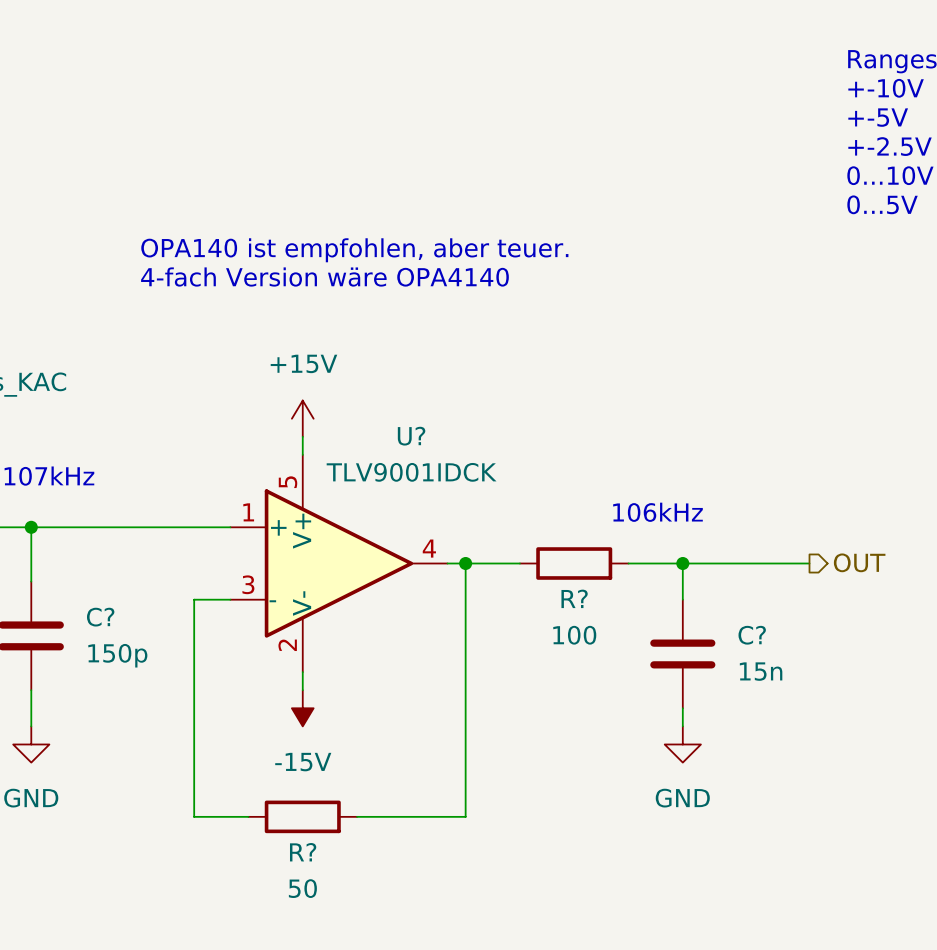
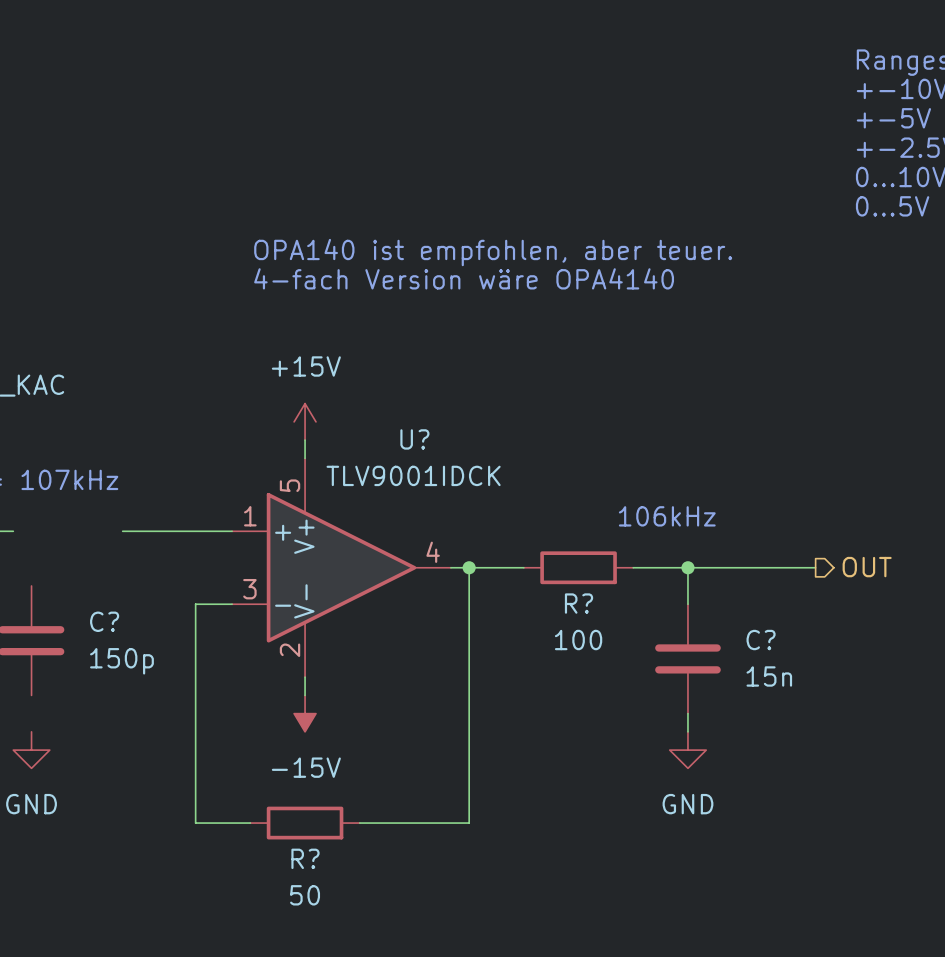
text position: OPA140 ist empfohlen, aber teuer. (354, 250) -> OPA140 ist empfohlen, aber teuer. (493, 252)
text position: 4-fach Version wäre OPA4140 (324, 277) -> 4-fach Version wäre OPA4140 (464, 278)
wire: (13, 527) (121, 527) -> none
wire: (31, 527) (31, 581) -> none
junction: (31, 527) -> none
wire: (31, 690) (31, 726) -> none

